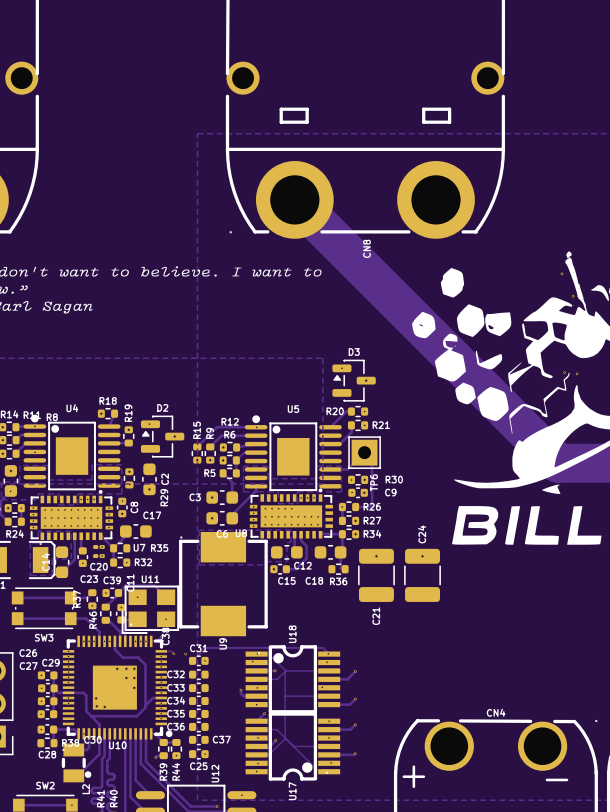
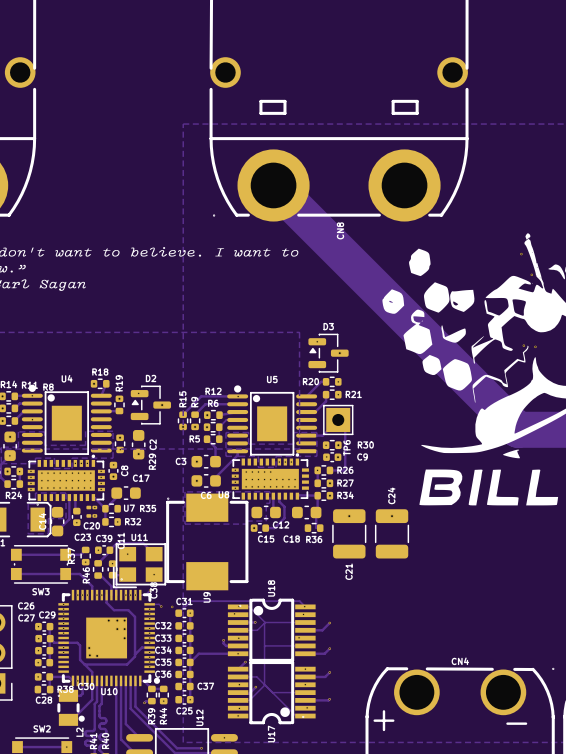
track: none -> (190, 613) (190, 699)
track: none -> (238, 653) (198, 653) (190, 662)

